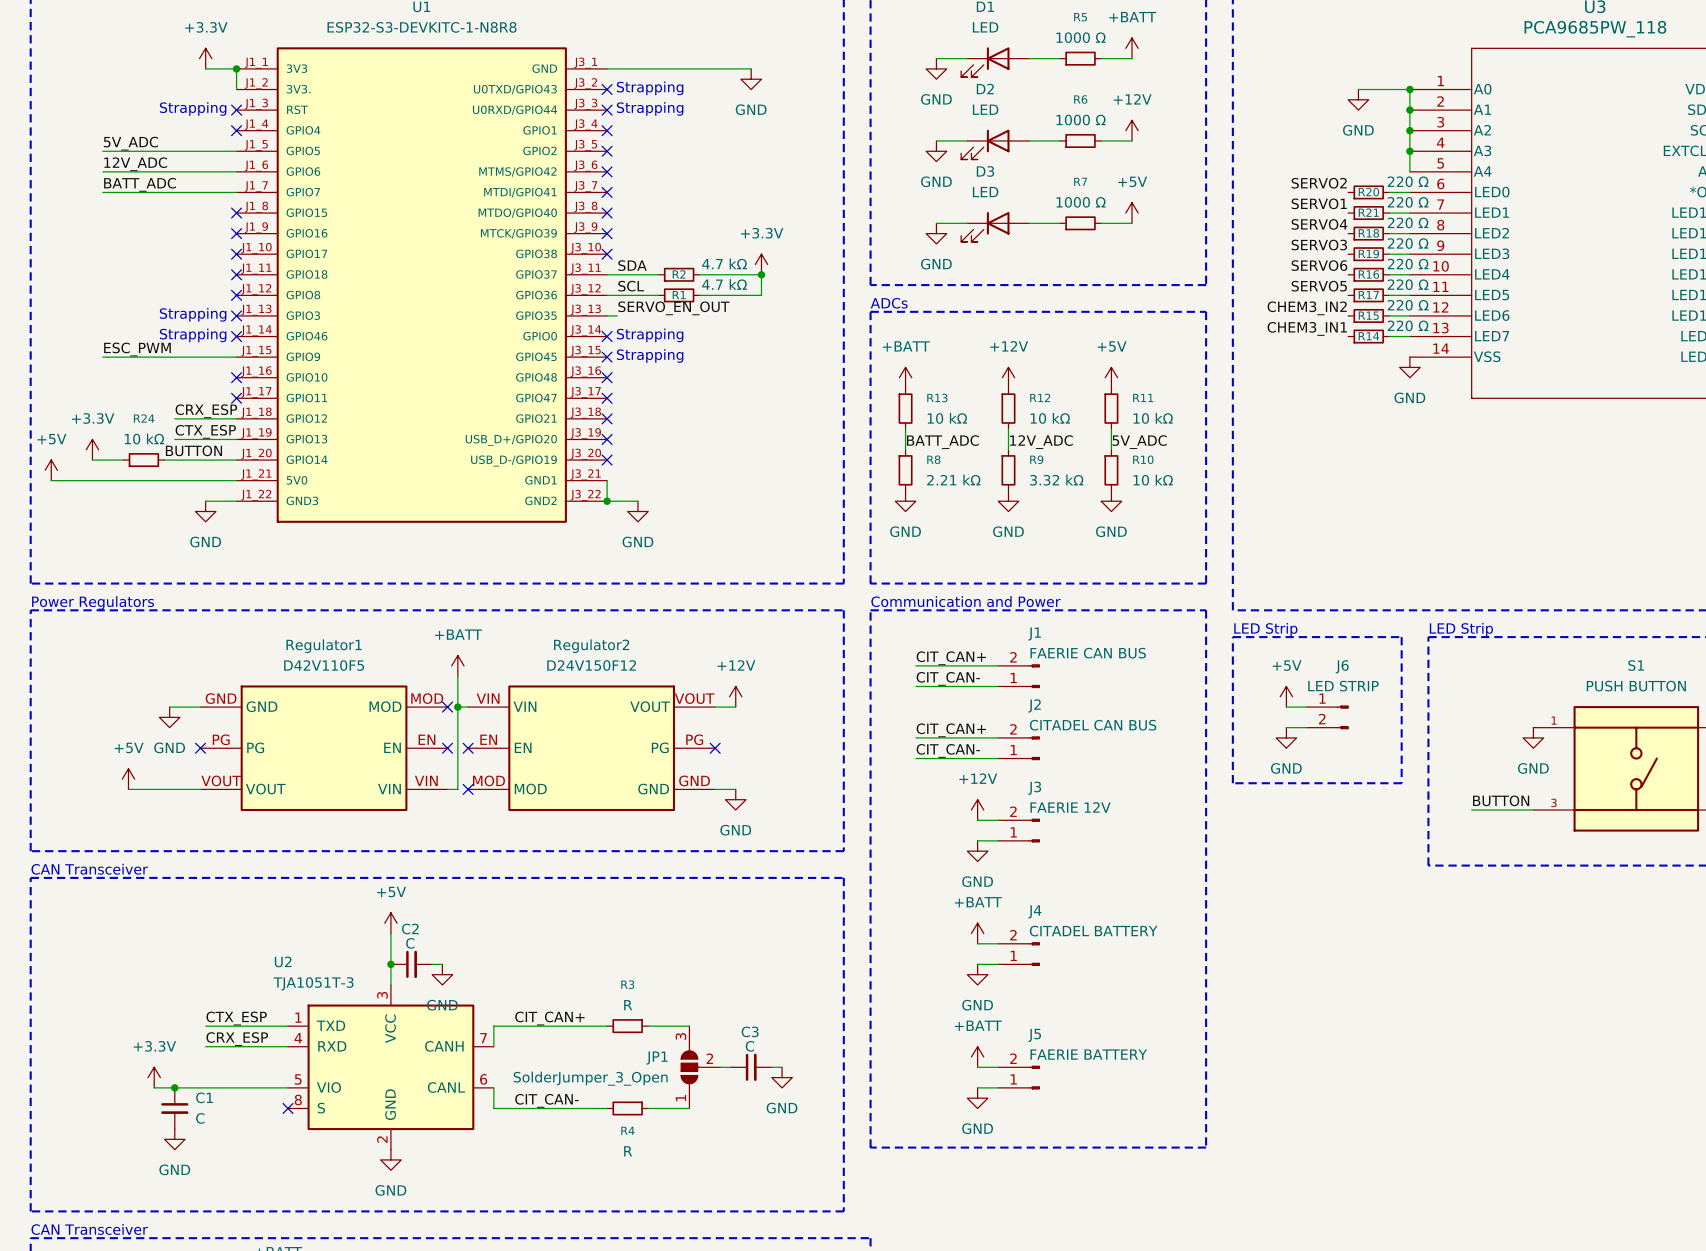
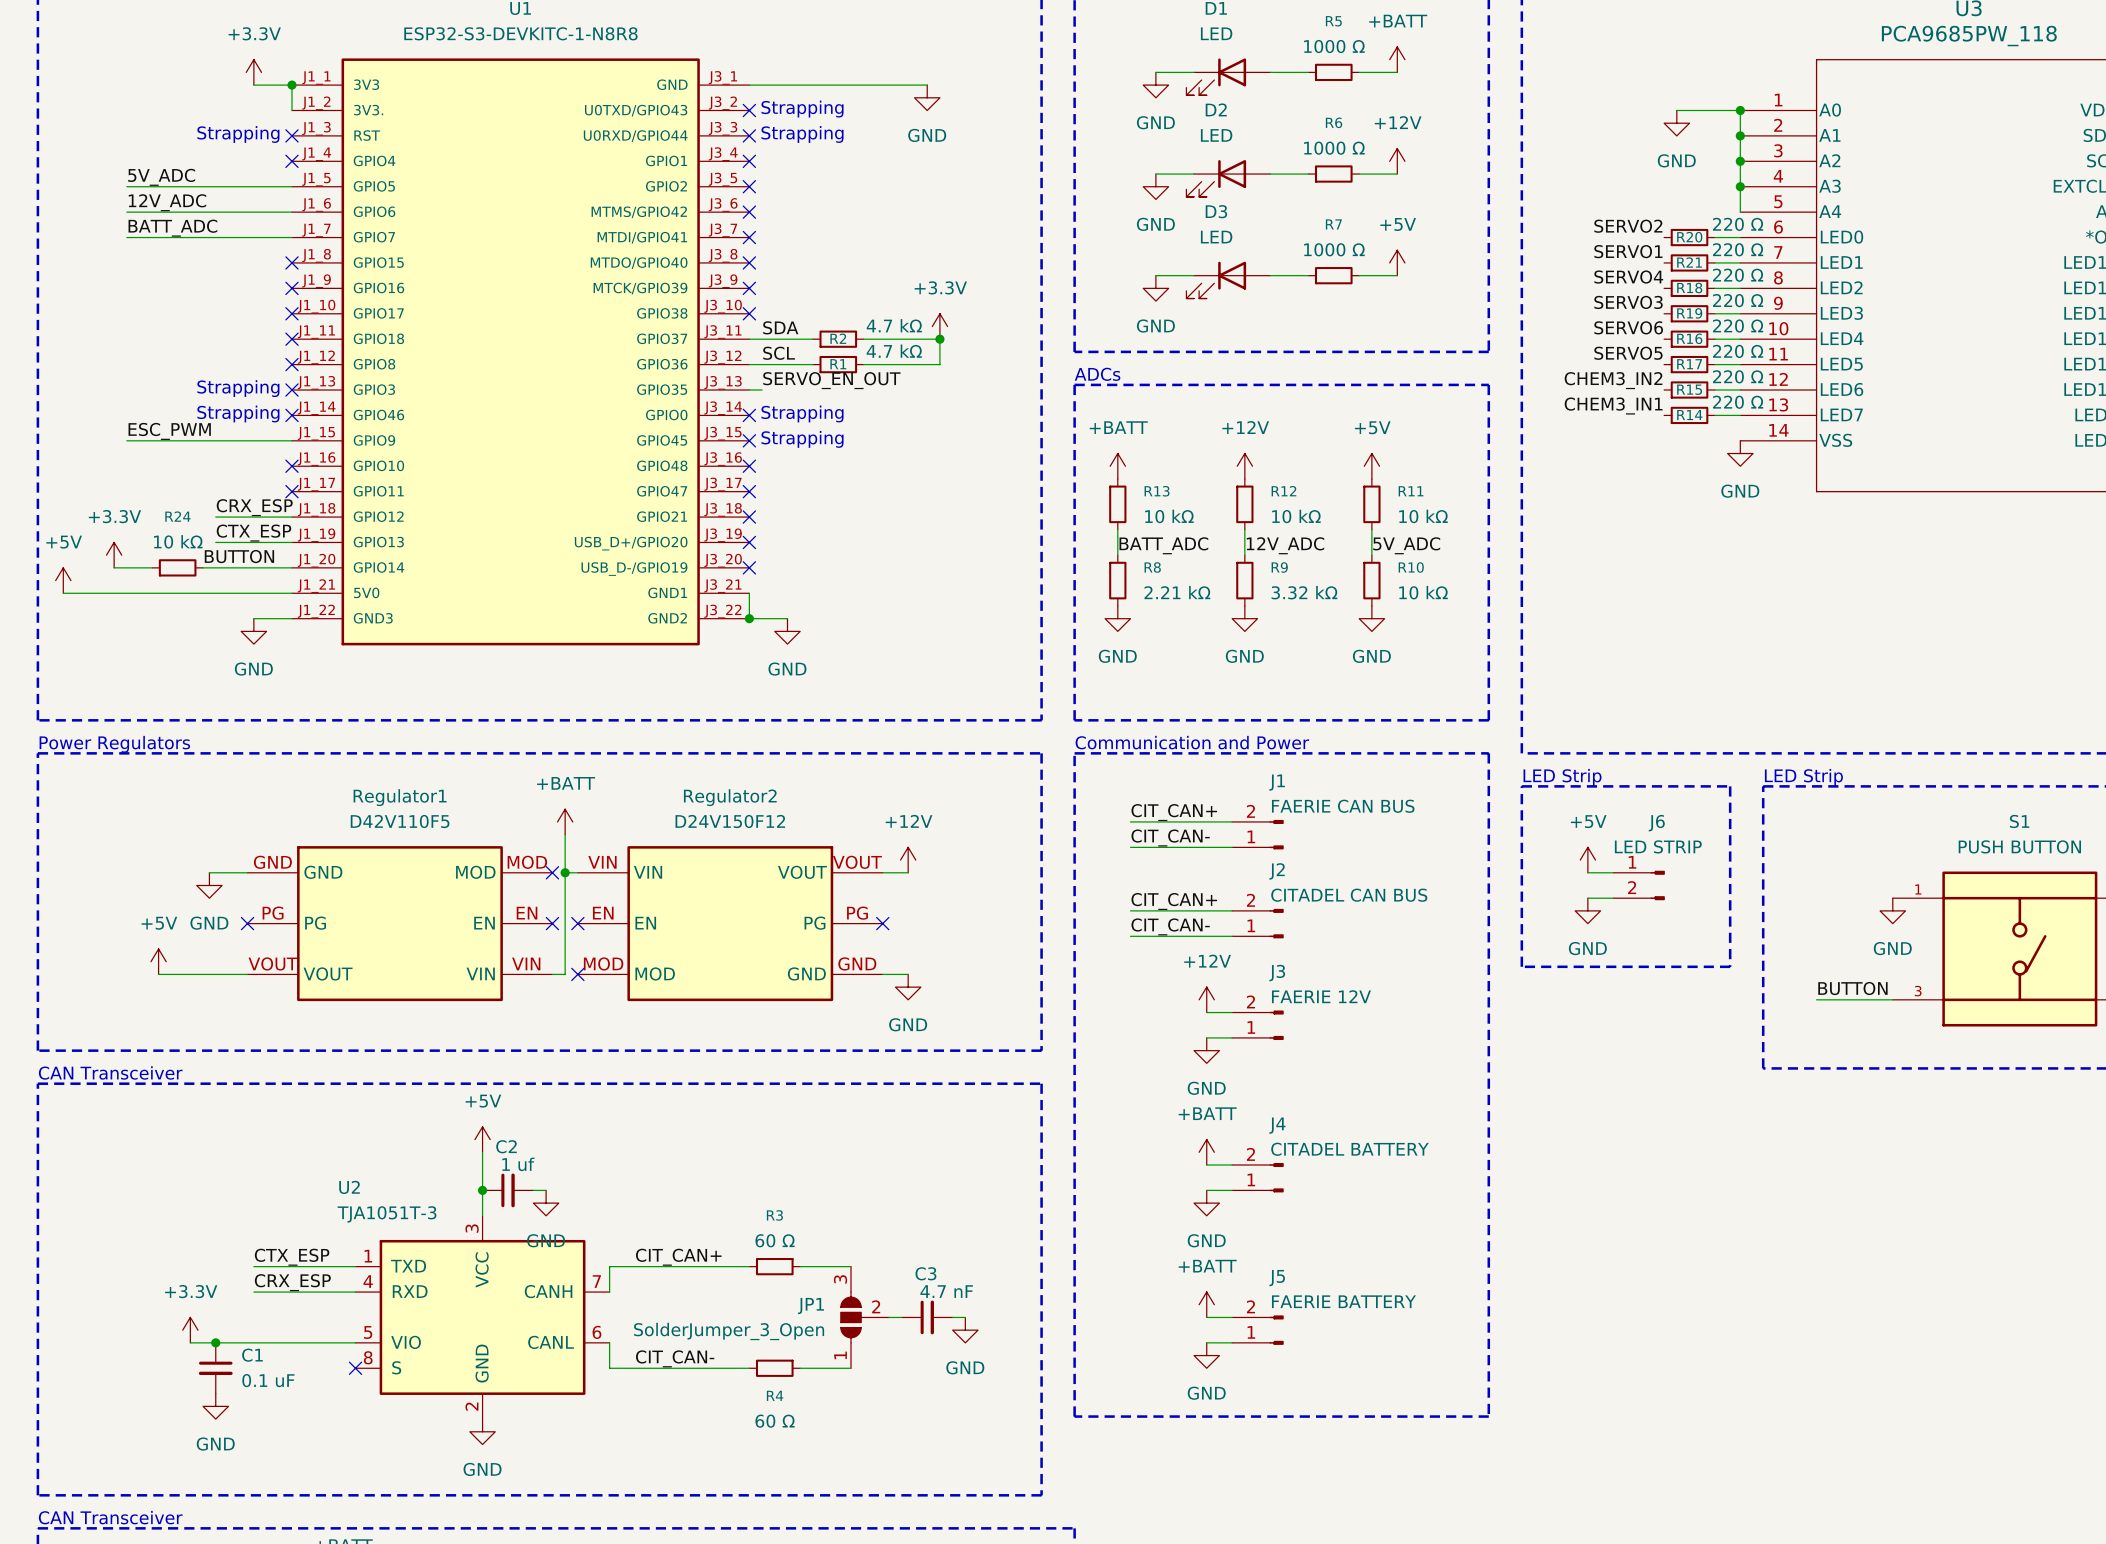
C2 value: C (410, 943) -> 1 uf (518, 1164)
R3 value: R (628, 1005) -> 60 Ω (775, 1240)
C3 value: C (749, 1046) -> 4.7 nF (946, 1291)
C1 value: C (200, 1118) -> 0.1 uF (268, 1380)
R4 value: R (628, 1151) -> 60 Ω (775, 1421)

